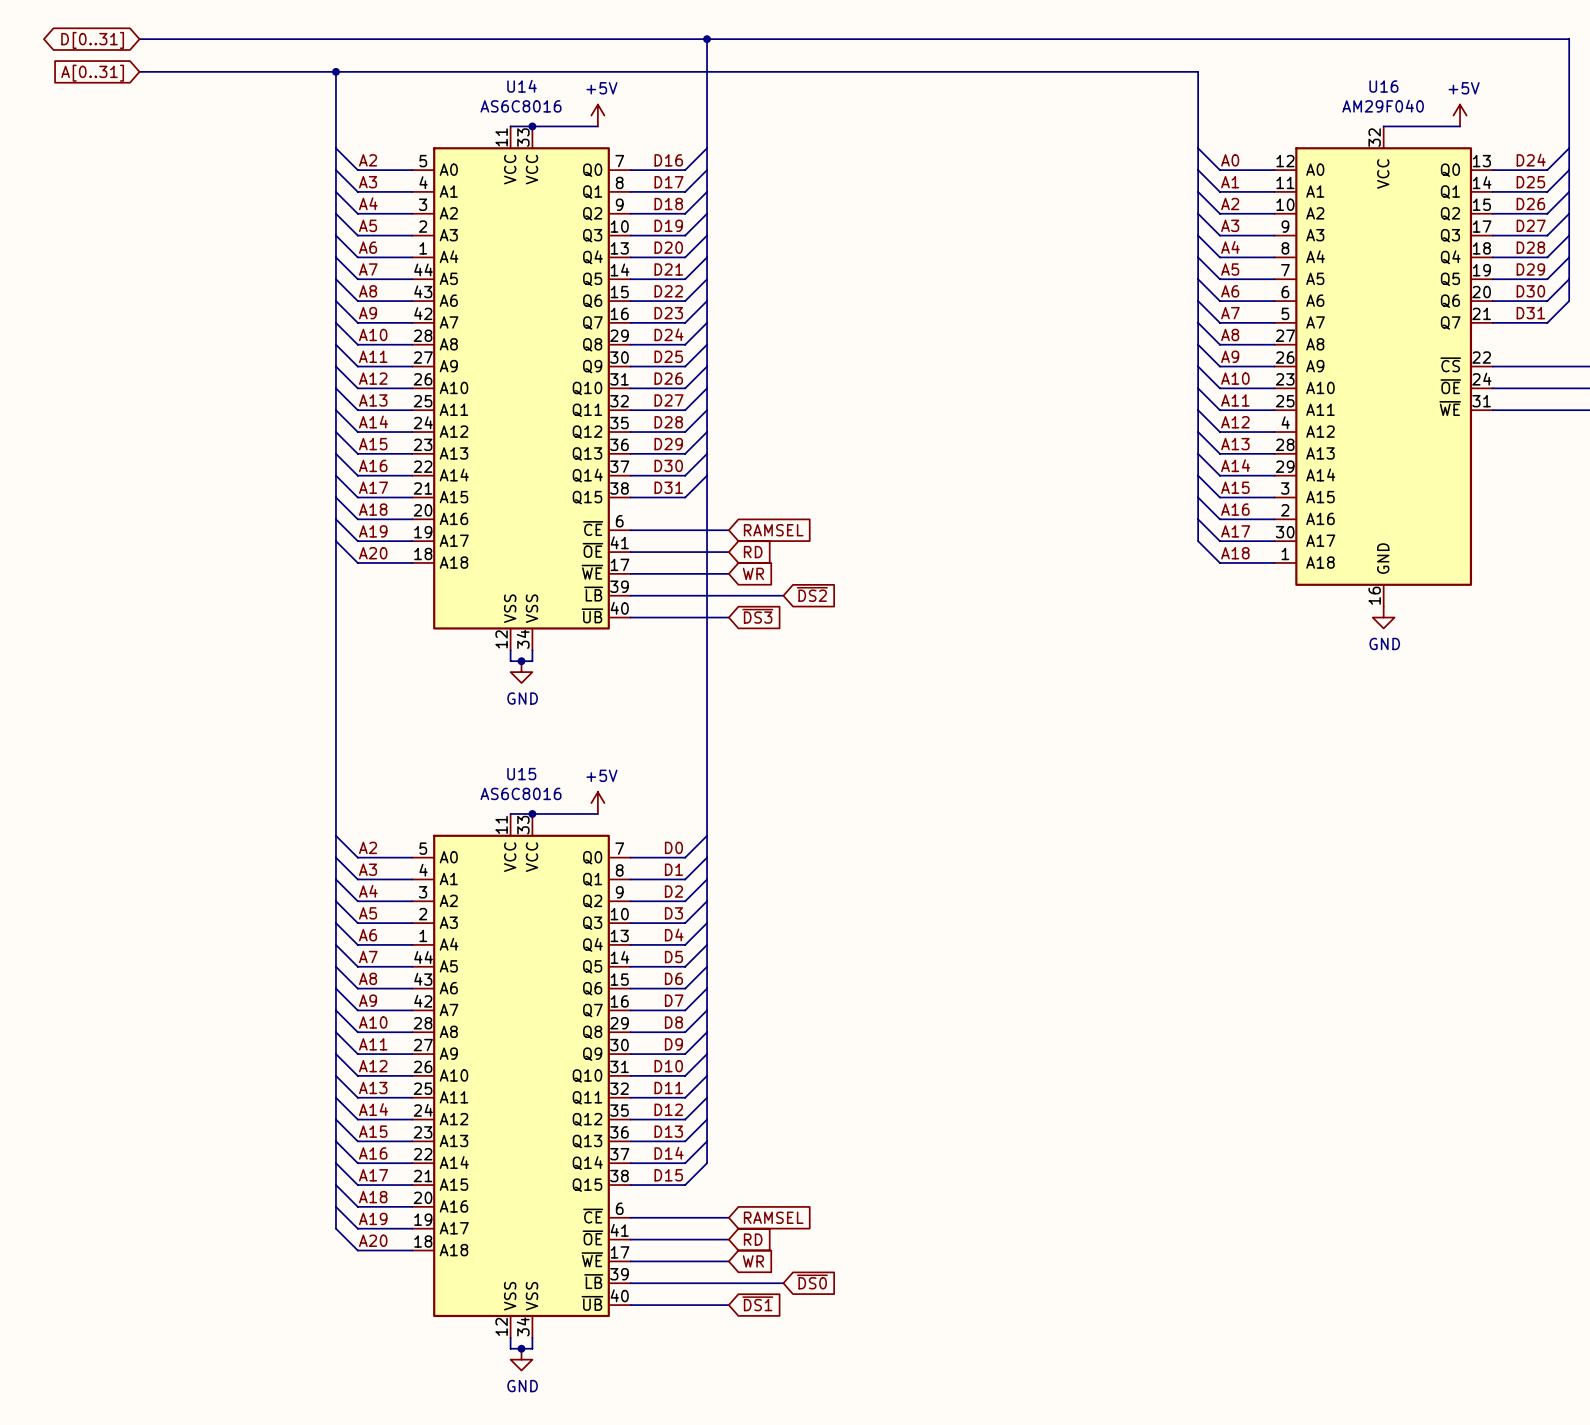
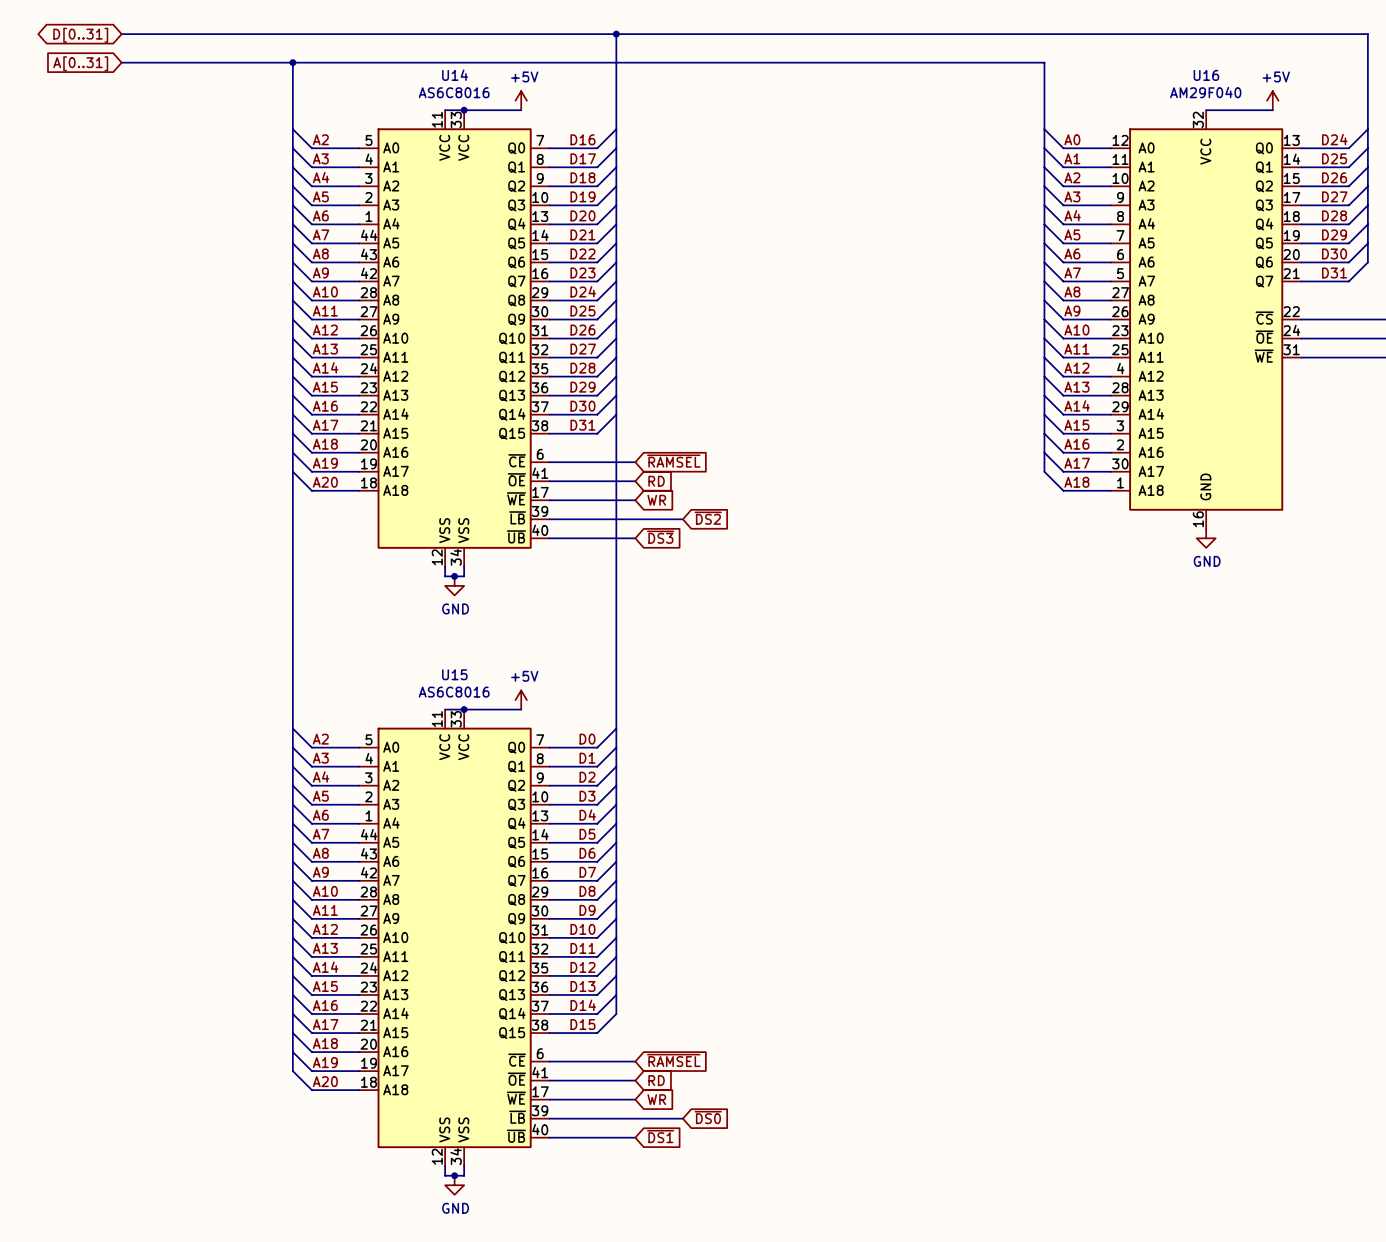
global label: RAMSEL (773, 530) -> ~{RAMSEL} (673, 461)
global label: RAMSEL (773, 1217) -> ~{RAMSEL} (673, 1060)

